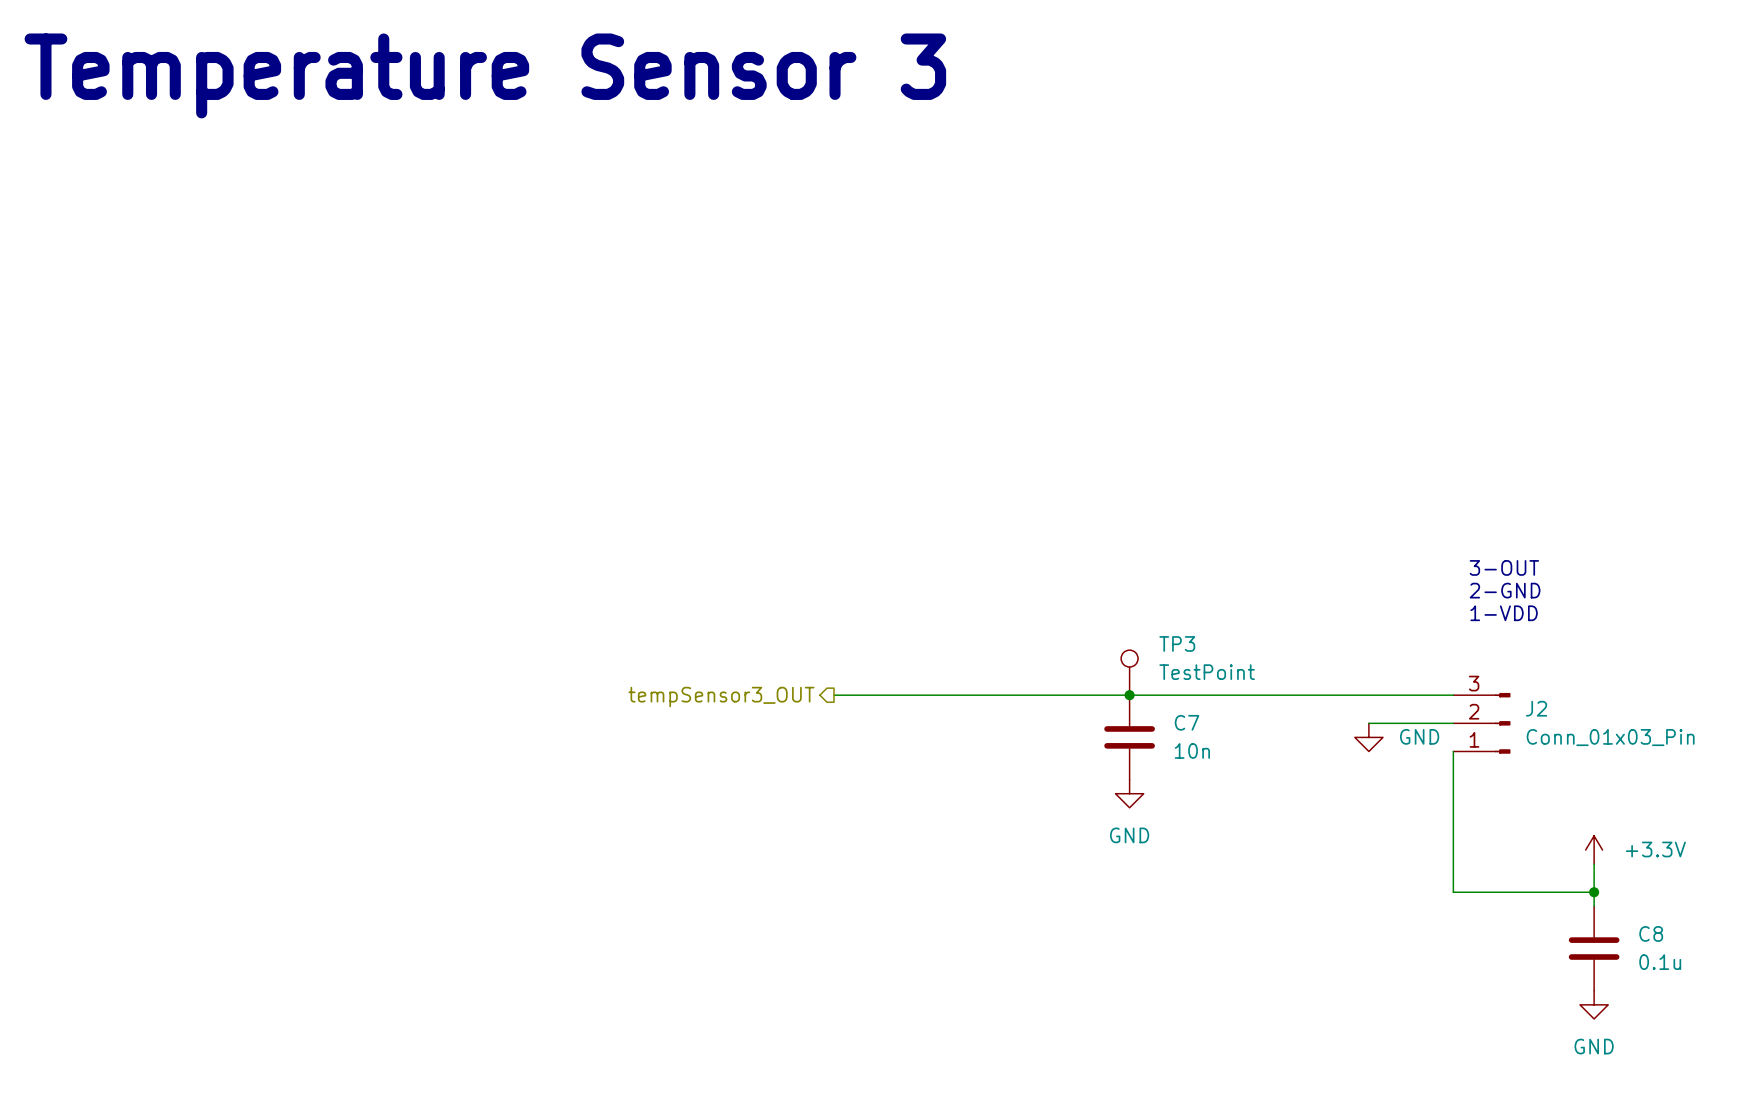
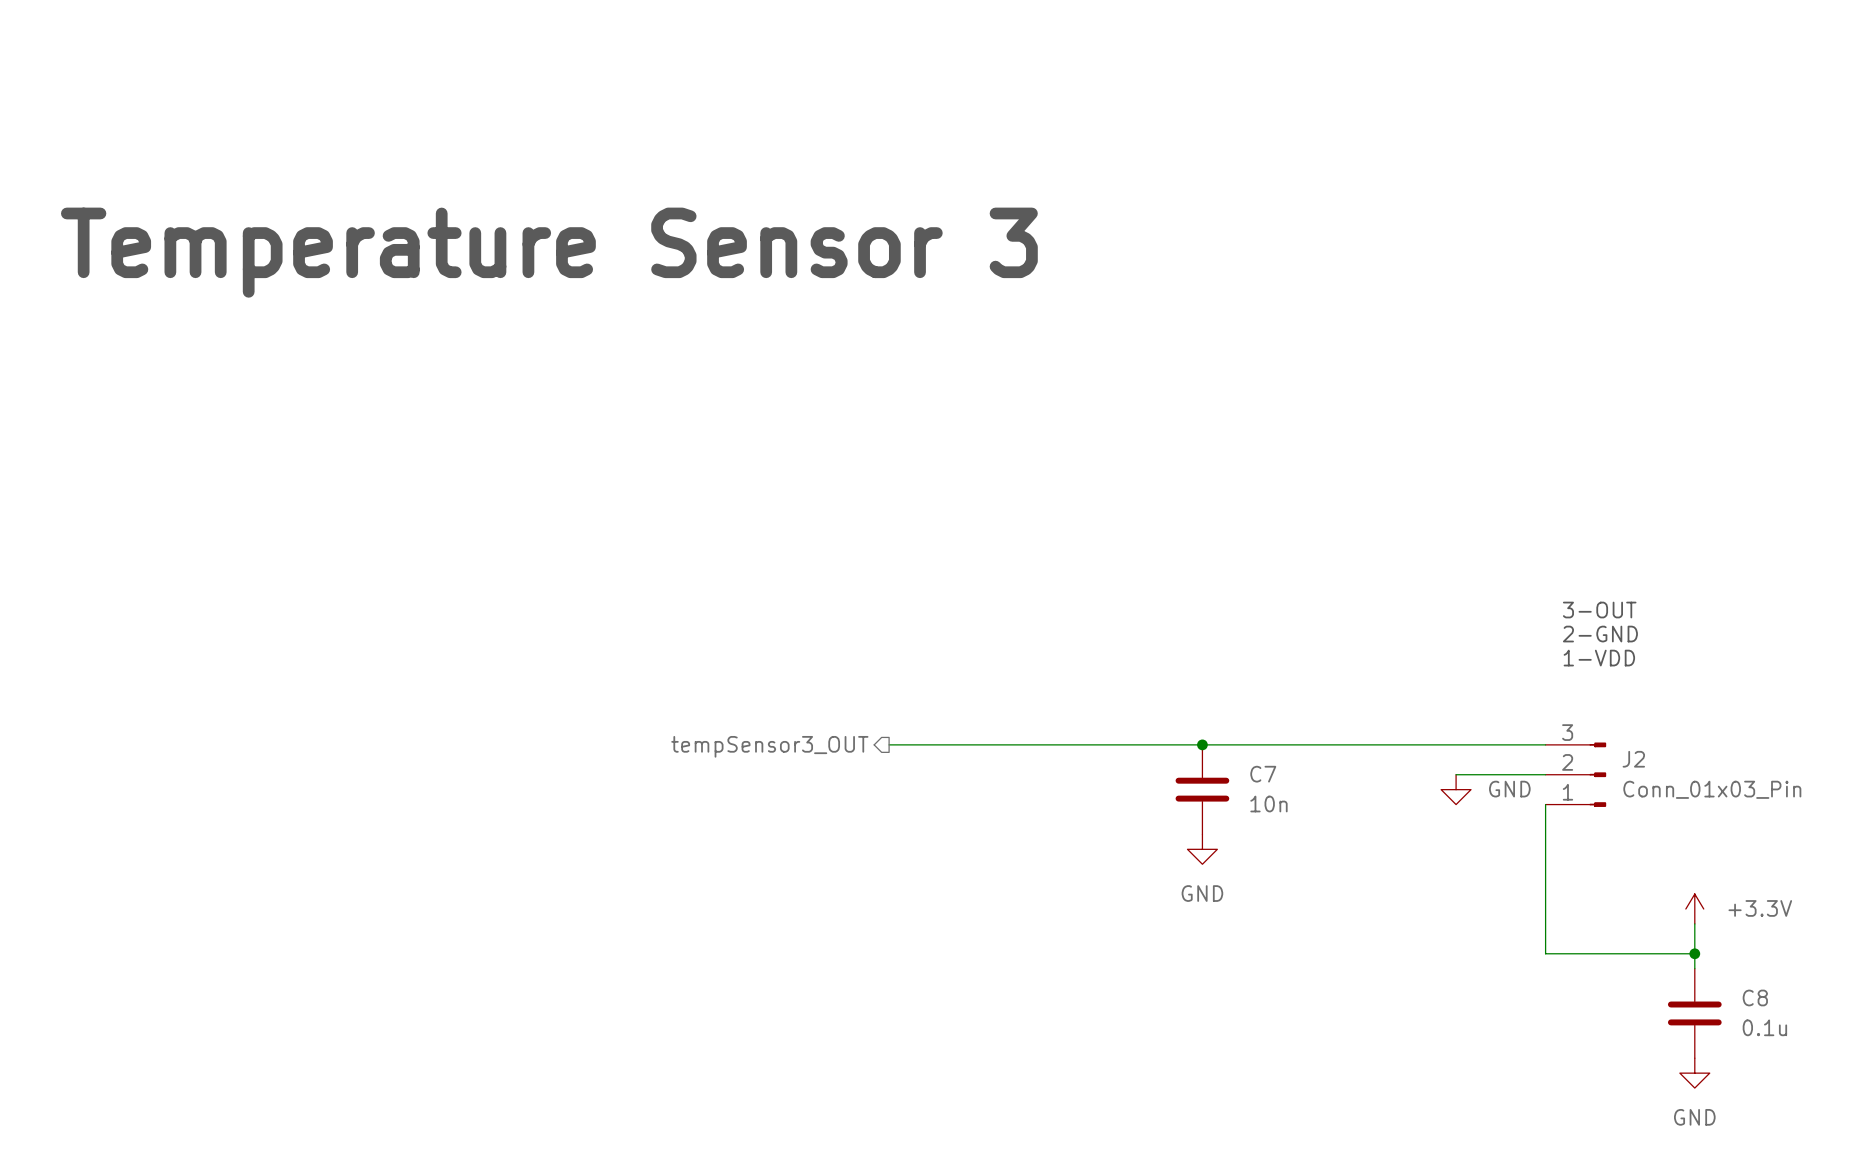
text position: Temperature Sensor 3 (485, 75) -> Temperature Sensor 3 (549, 252)
TP3: TestPoint (1129, 672) -> none

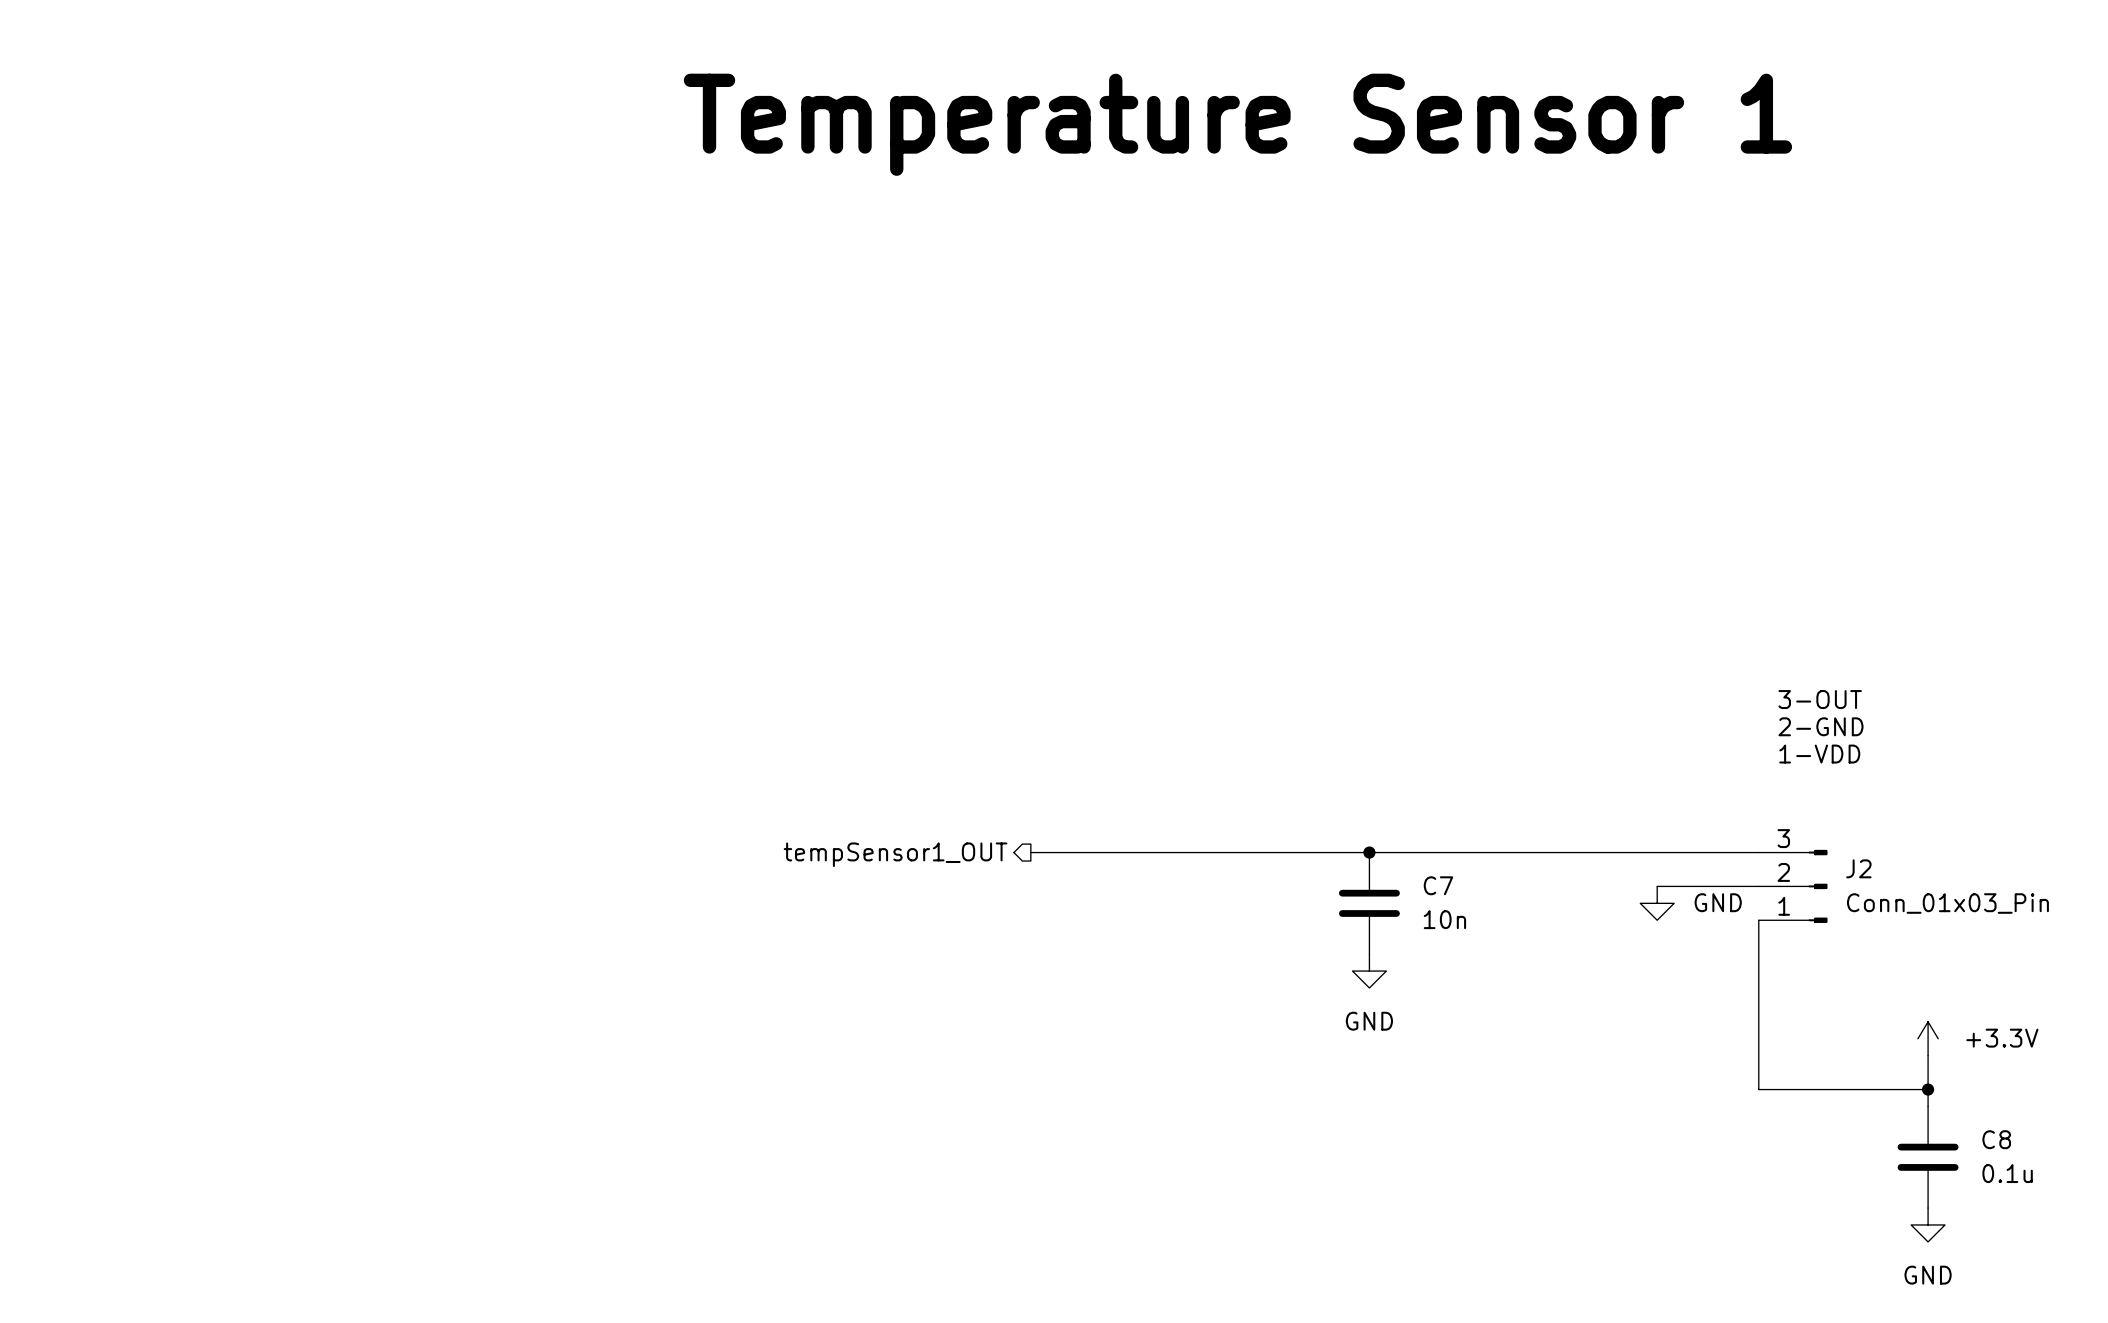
text: none -> Temperature Sensor 1 (1237, 124)
text: Temperature Sensor 3 (549, 252) -> none
wire: (889, 744) (904, 744) -> none
hierarchical label: tempSensor3_OUT (769, 746) -> tempSensor1_OUT (895, 854)

